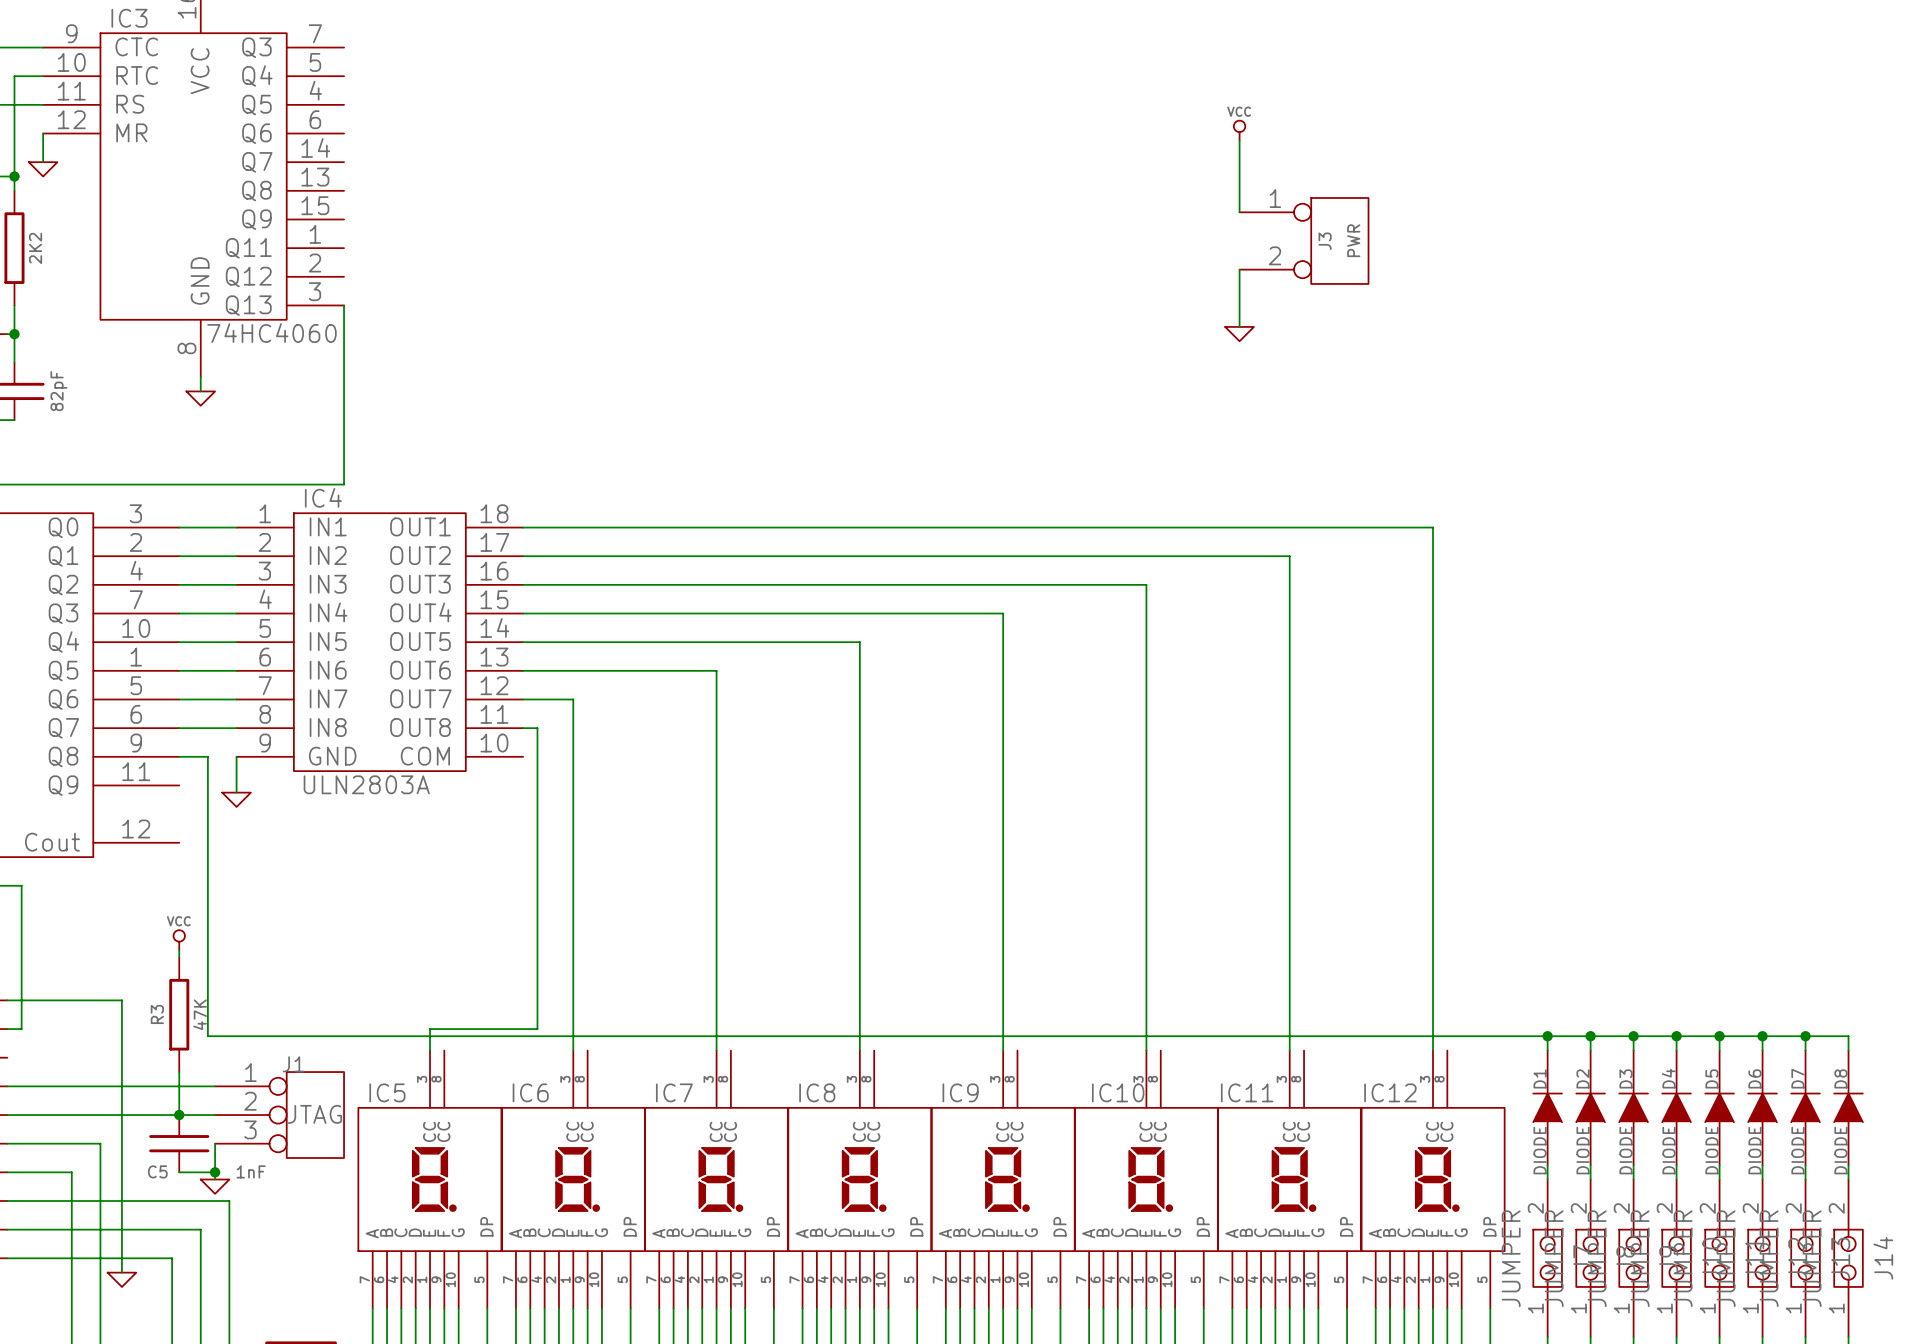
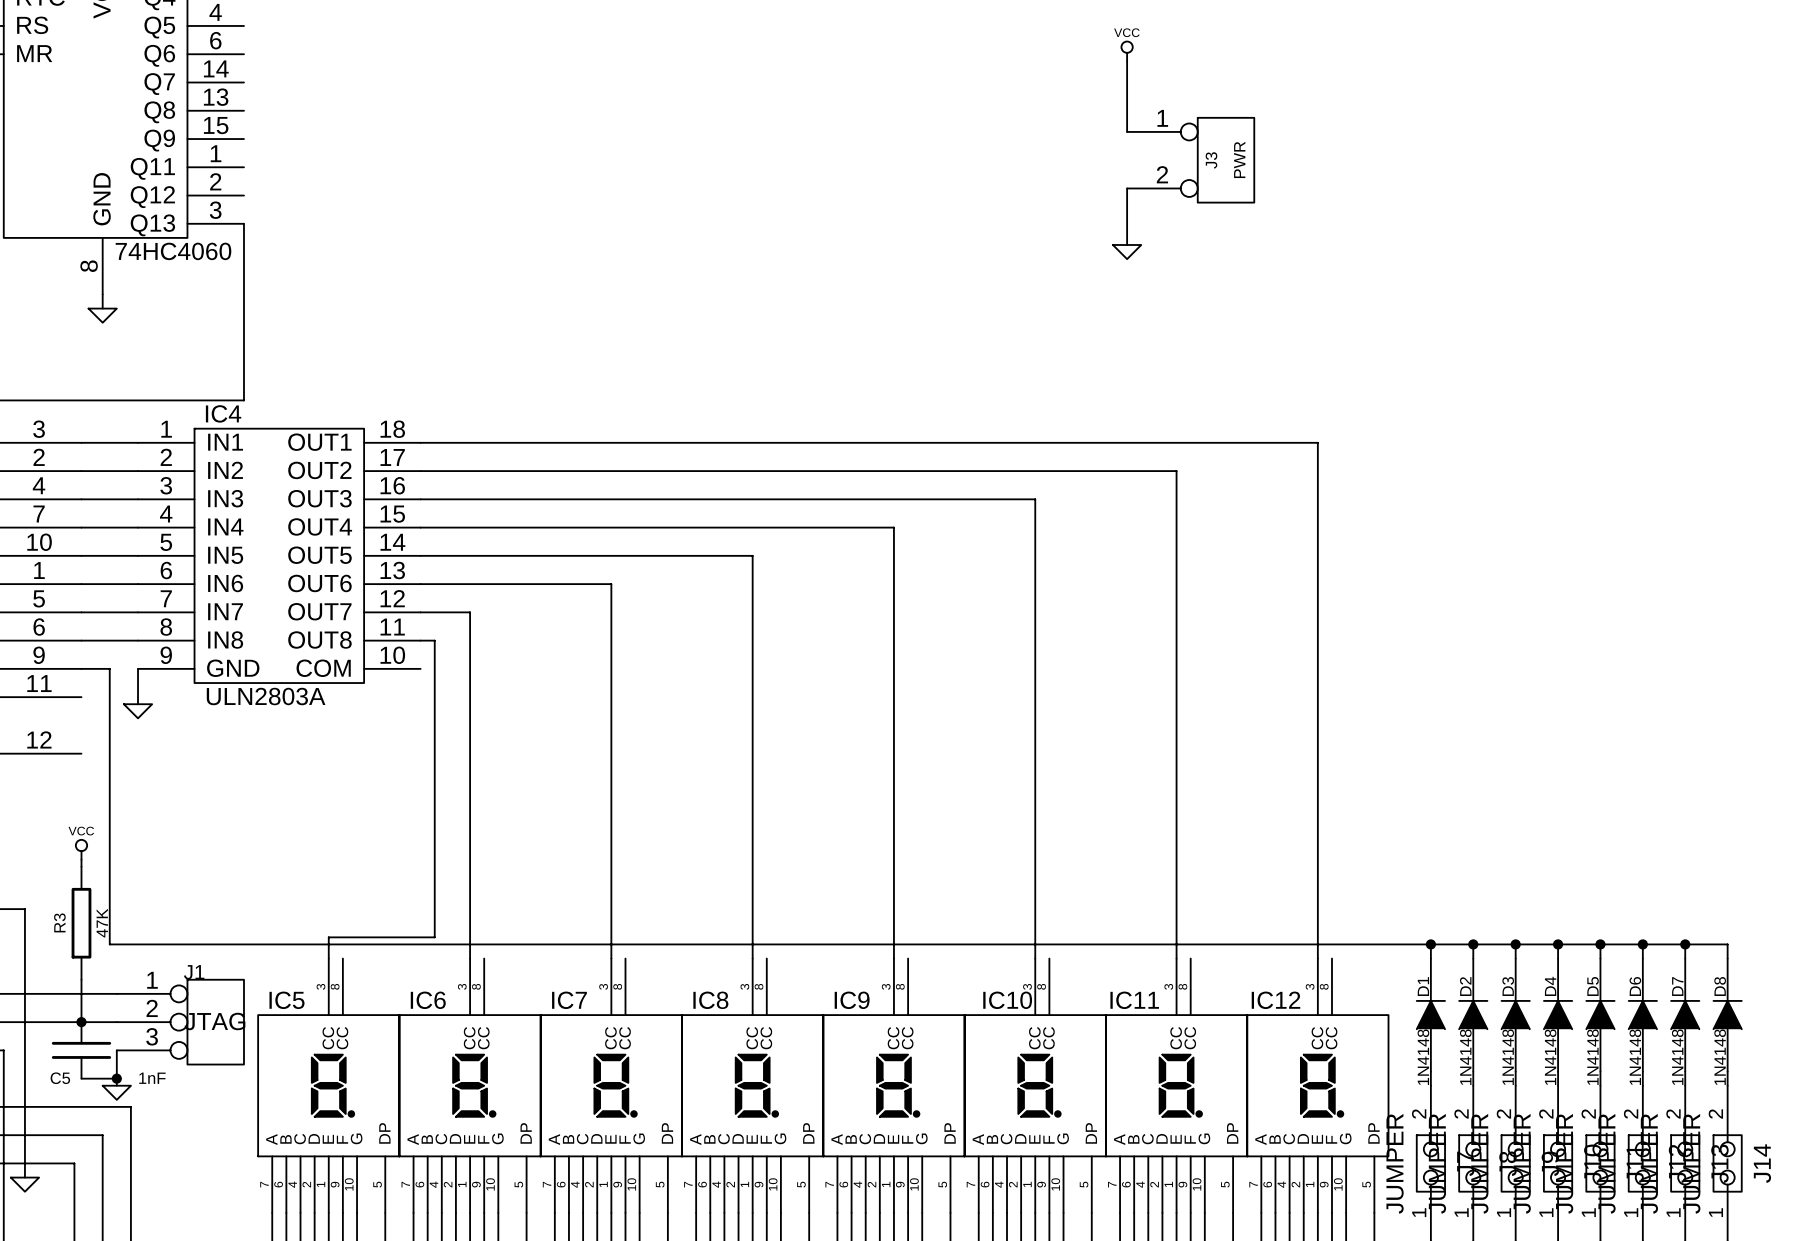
D1 value: DIODE (1540, 1150) -> 1N4148 (1423, 1057)
D2 value: DIODE (1583, 1150) -> 1N4148 (1465, 1057)
D3 value: DIODE (1626, 1150) -> 1N4148 (1508, 1057)
D4 value: DIODE (1668, 1150) -> 1N4148 (1550, 1057)
D5 value: DIODE (1711, 1150) -> 1N4148 (1592, 1057)
D6 value: DIODE (1754, 1150) -> 1N4148 (1635, 1057)
D7 value: DIODE (1797, 1150) -> 1N4148 (1677, 1057)
D8 value: DIODE (1840, 1150) -> 1N4148 (1720, 1057)

